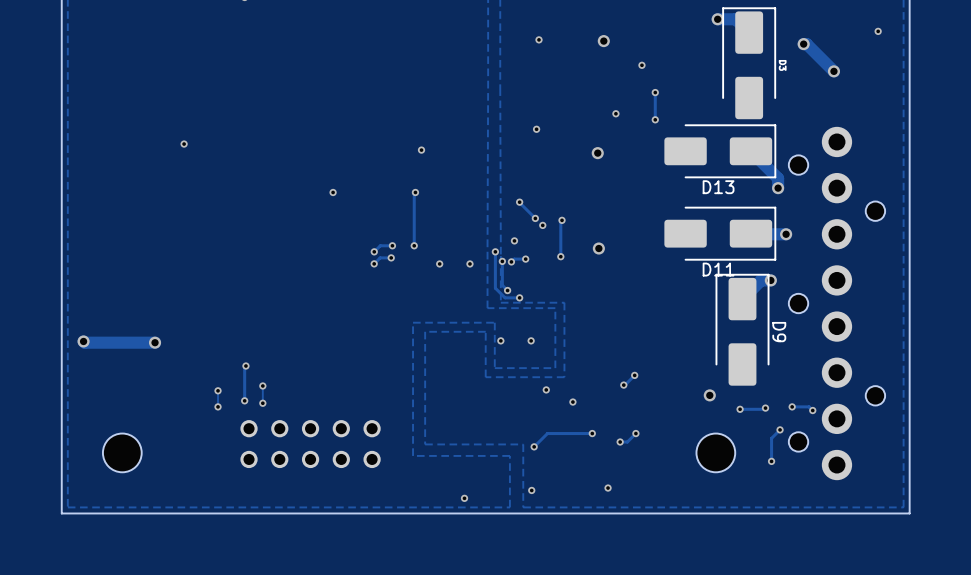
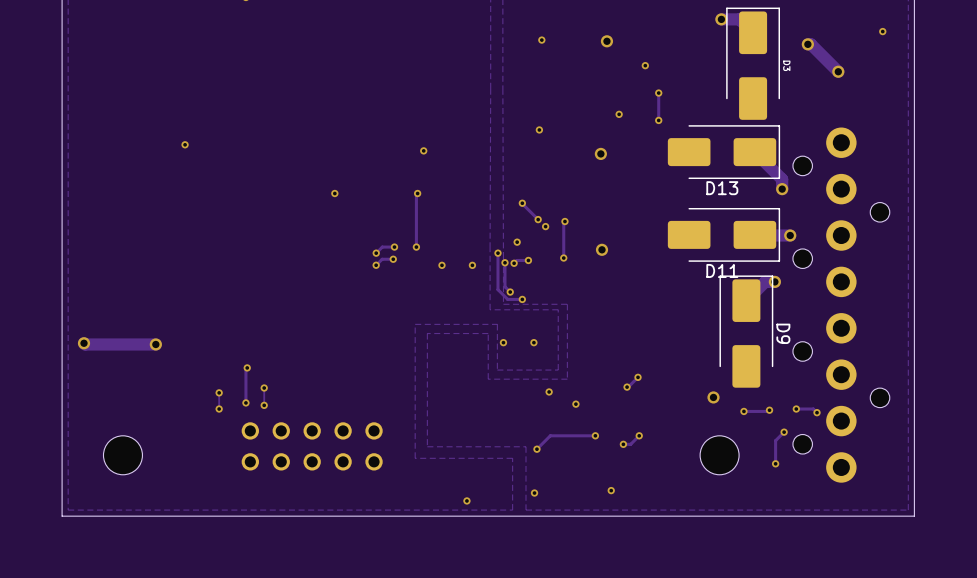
part footprint: [788, 126, 886, 481] -> [792, 127, 890, 483]

